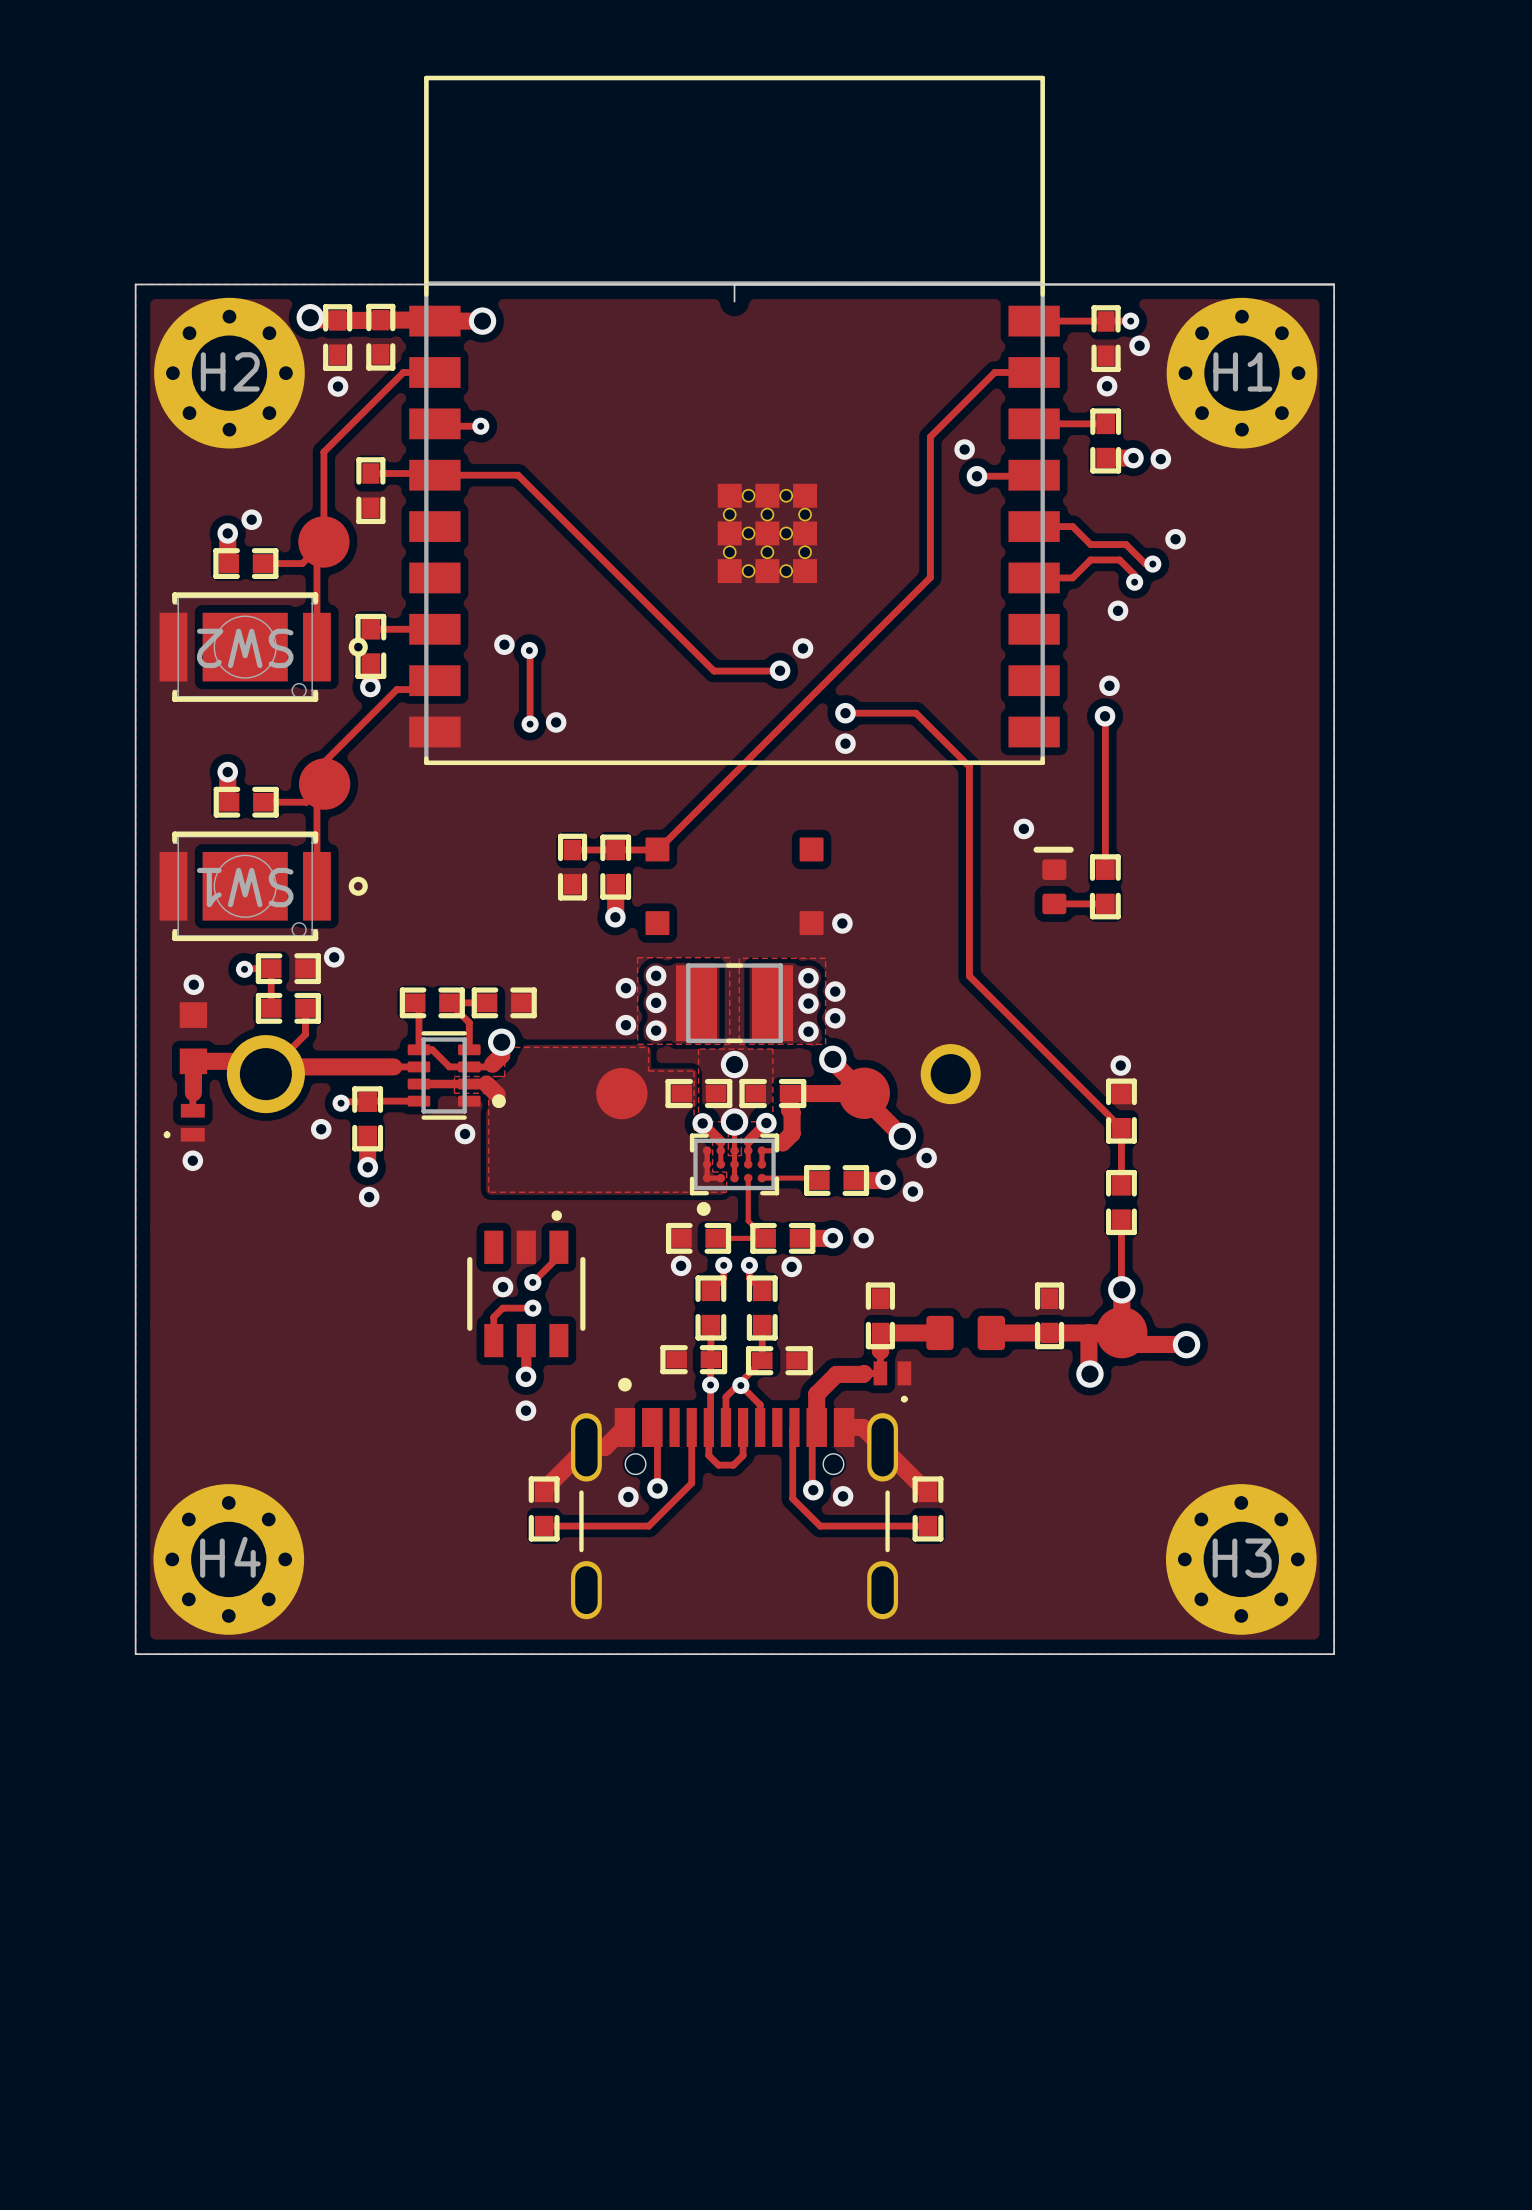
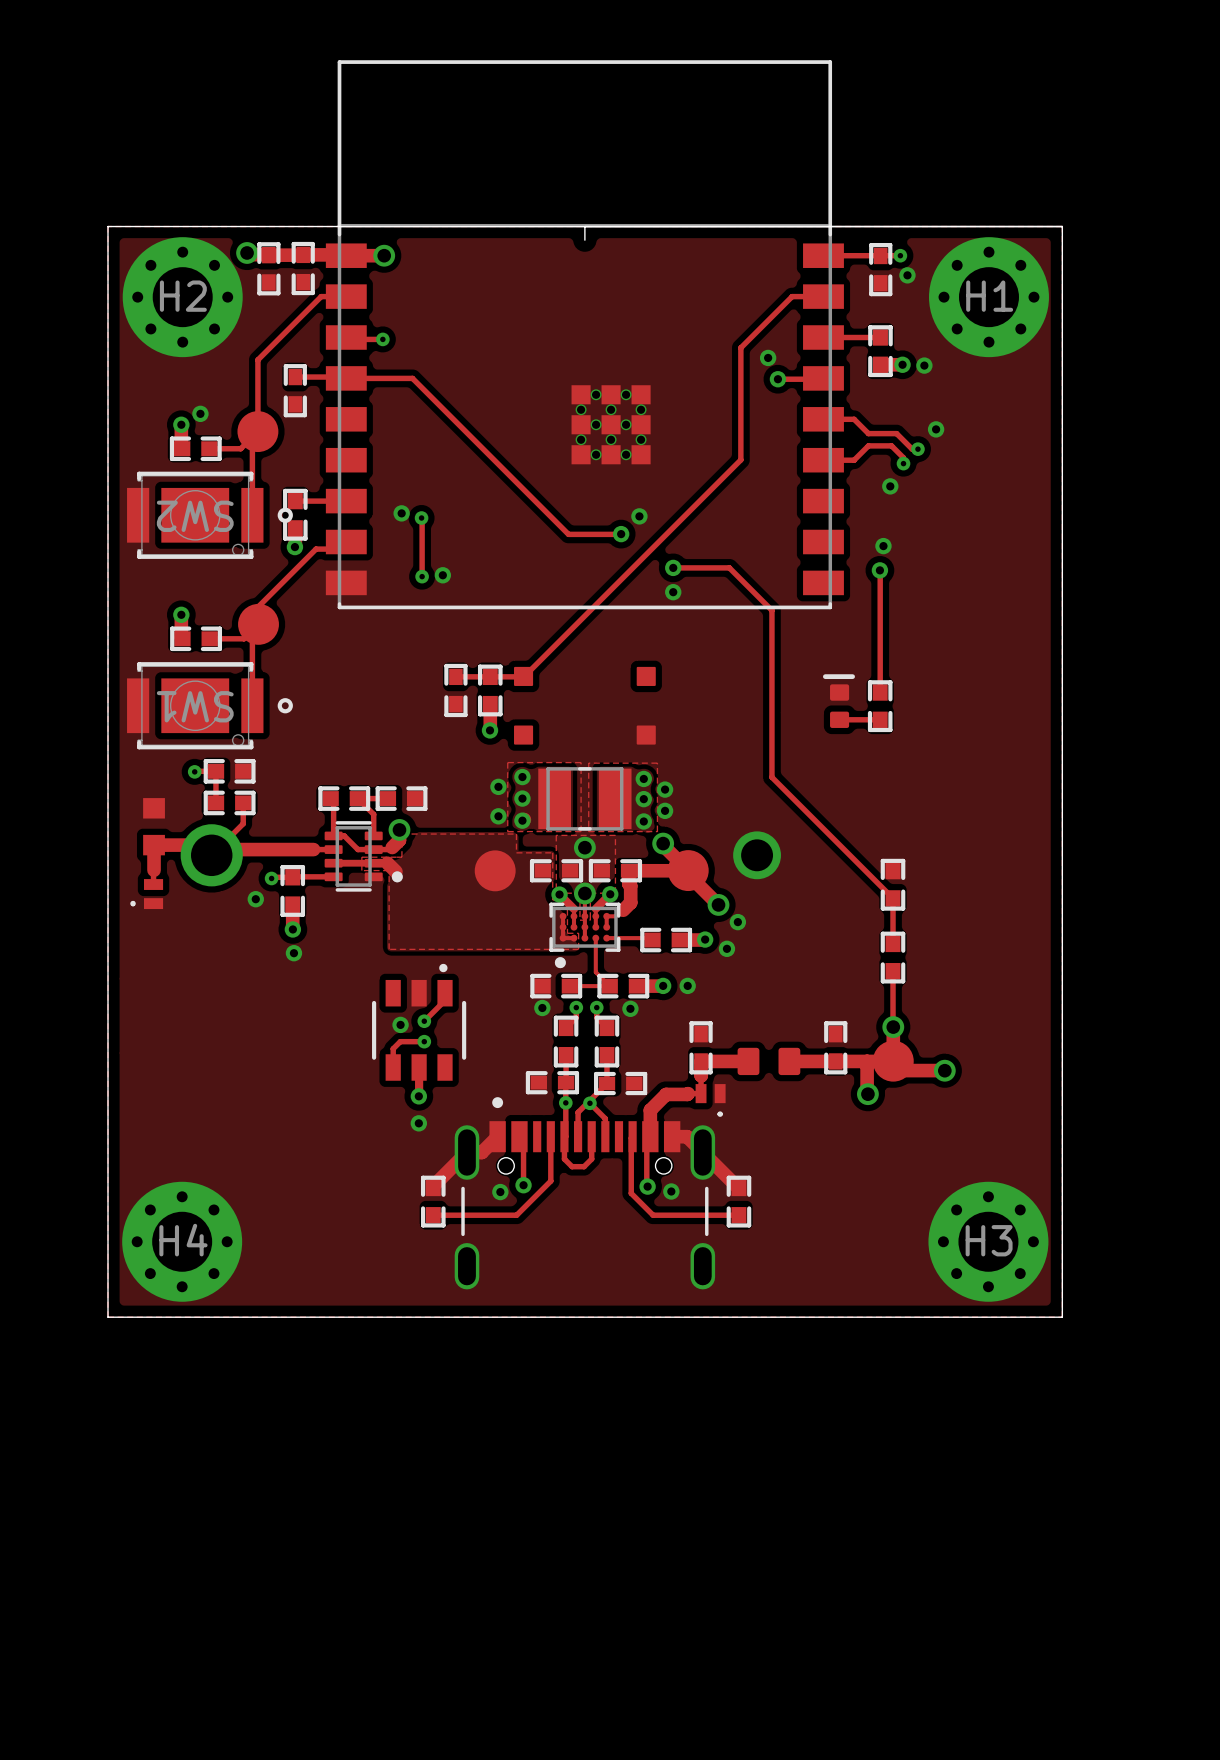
via: (338, 386) -> none
via: (1107, 386) -> none
via: (1023, 828) -> none
via: (842, 923) -> none
via: (334, 957) -> none
via: (193, 984) -> none
via: (1120, 1065) -> none
via: (465, 1134) -> none
via: (192, 1160) -> none

